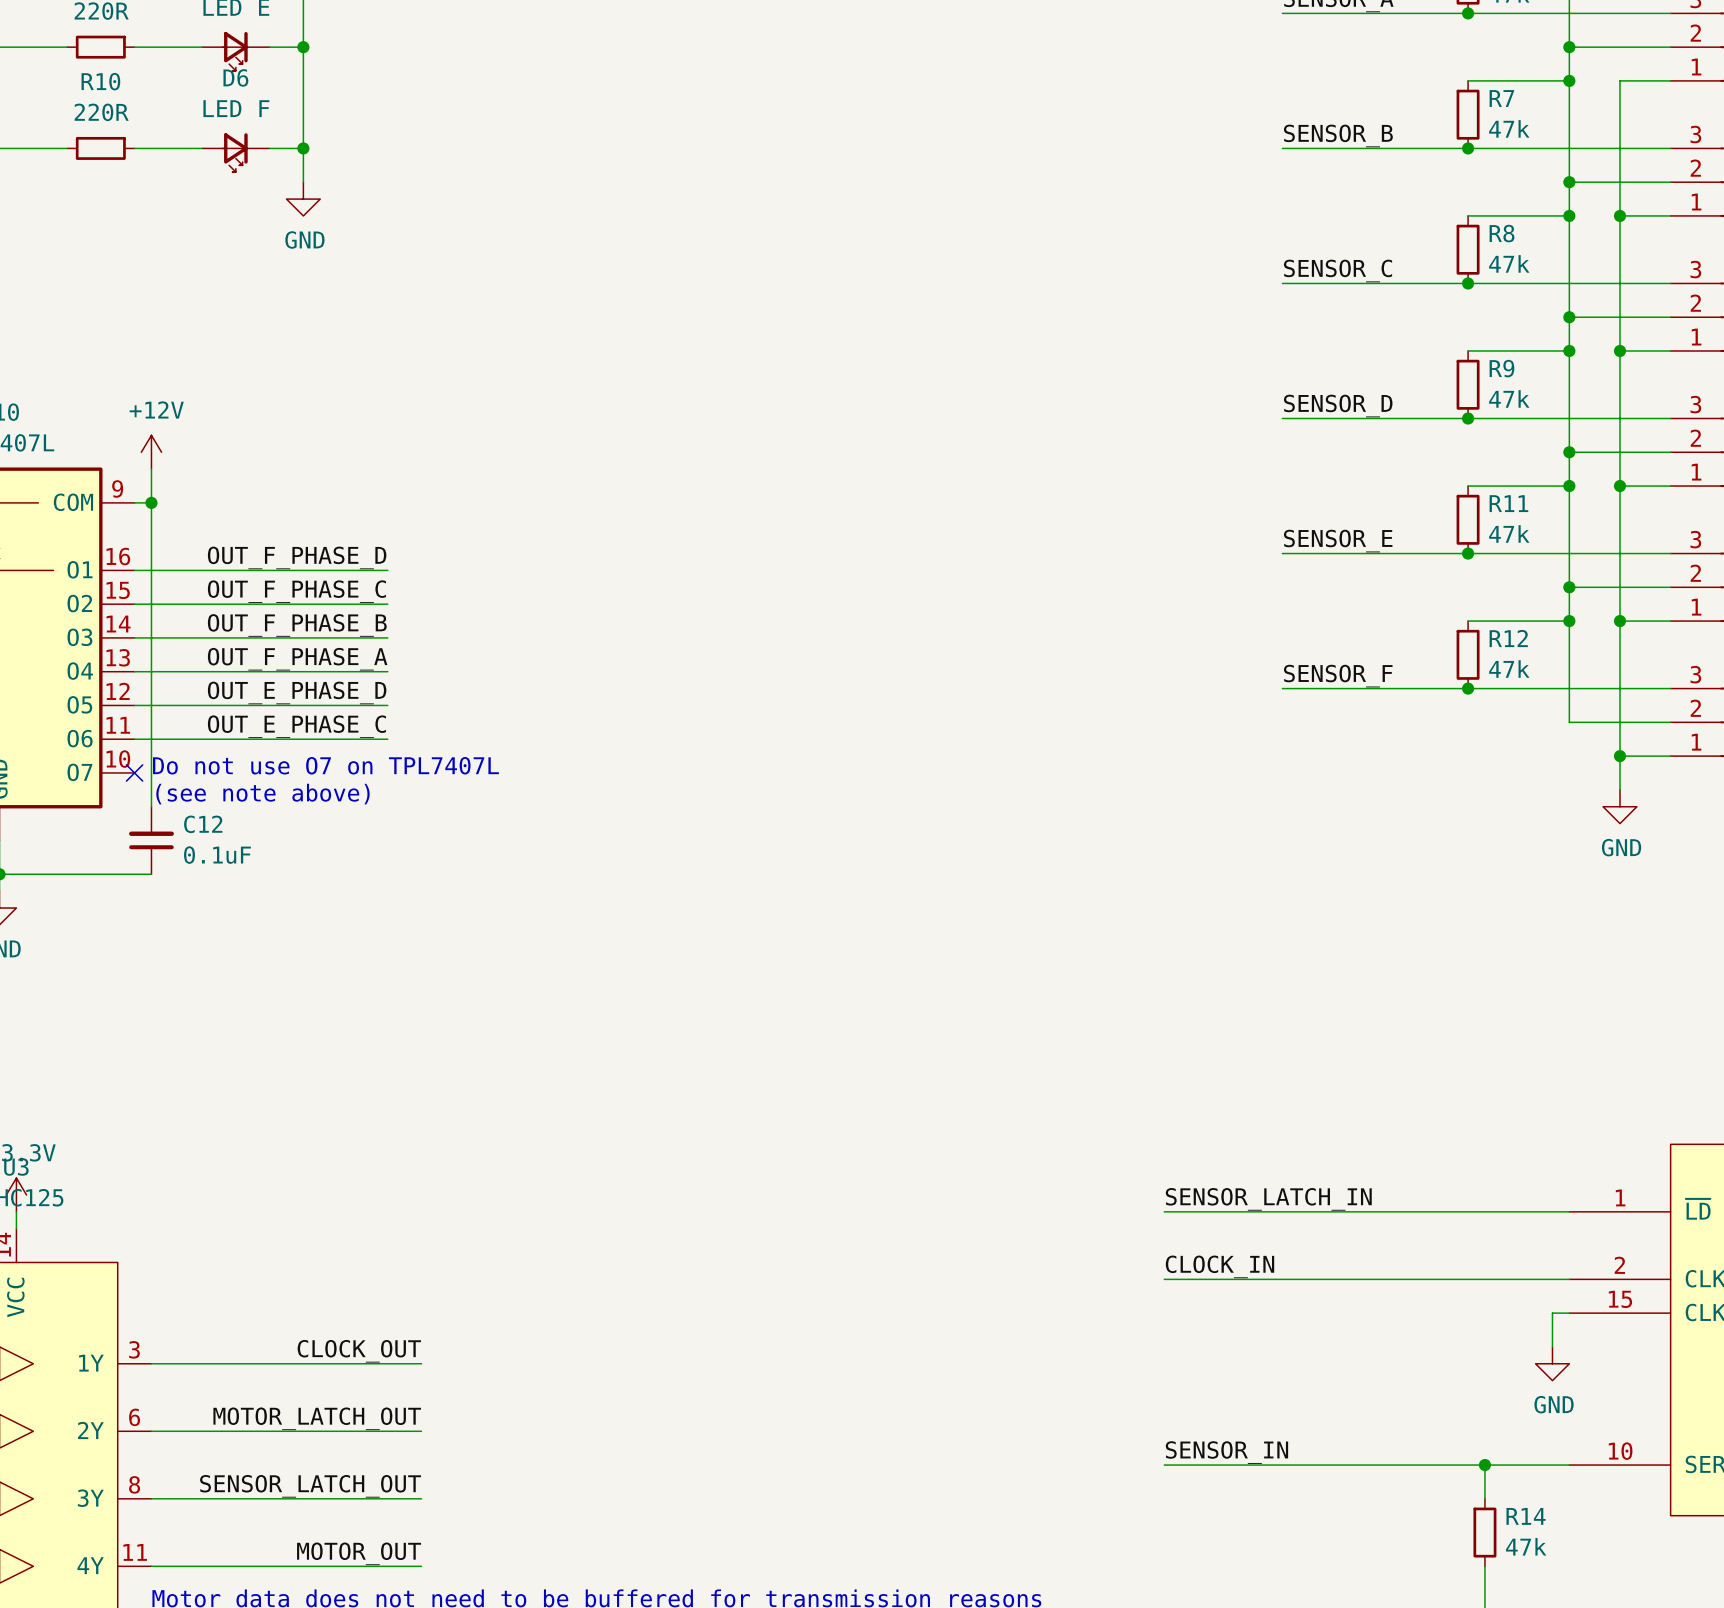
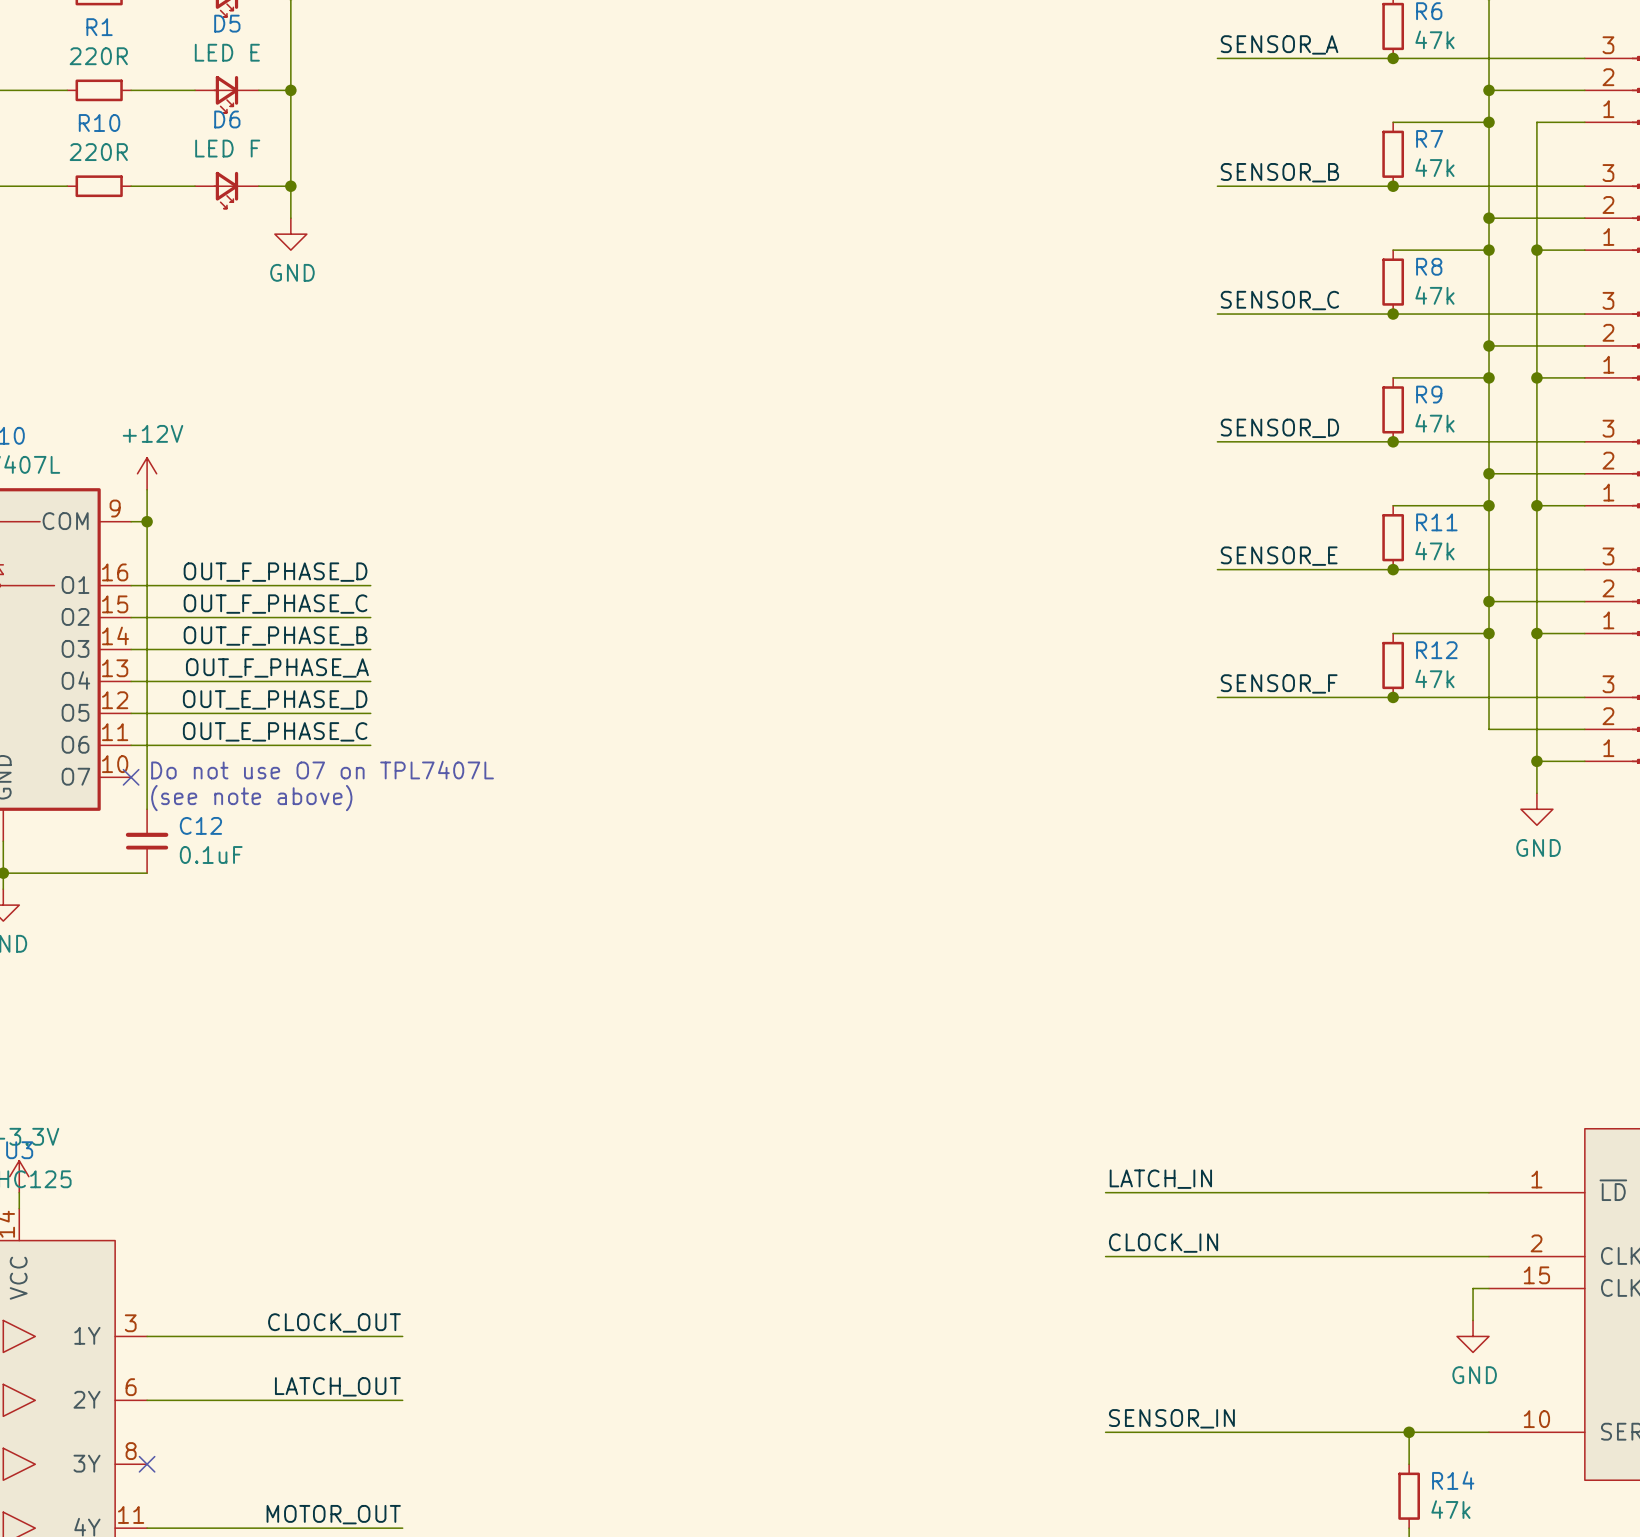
label: SENSOR_LATCH_IN (1268, 1199) -> LATCH_IN (1160, 1179)
label: MOTOR_LATCH_OUT (317, 1418) -> LATCH_OUT (337, 1386)
label: SENSOR_LATCH_OUT (310, 1486) -> none
wire: (151, 1498) (421, 1498) -> none
no-connect mark: none -> (147, 1464)

